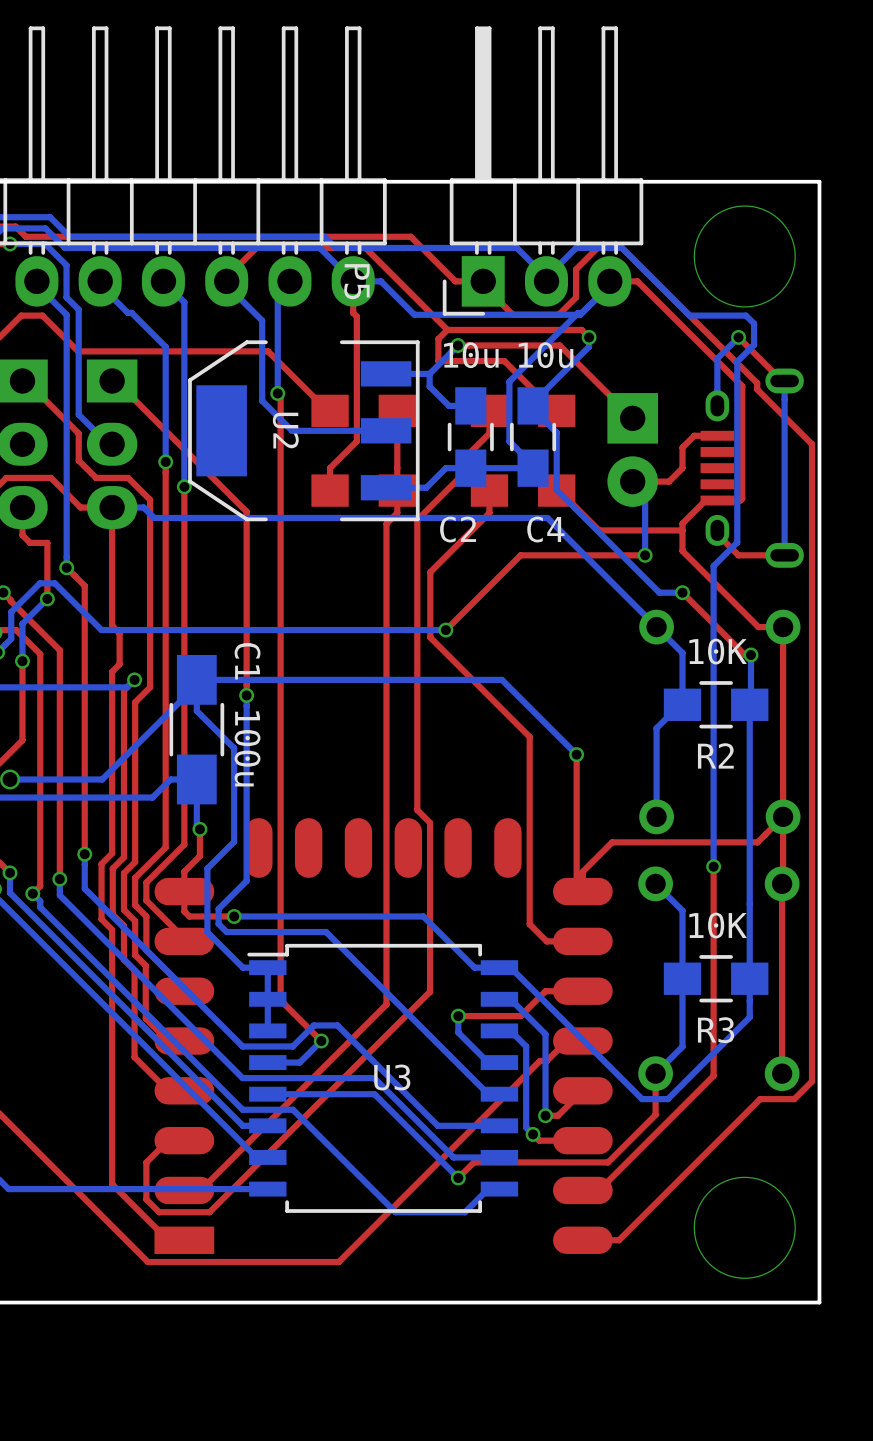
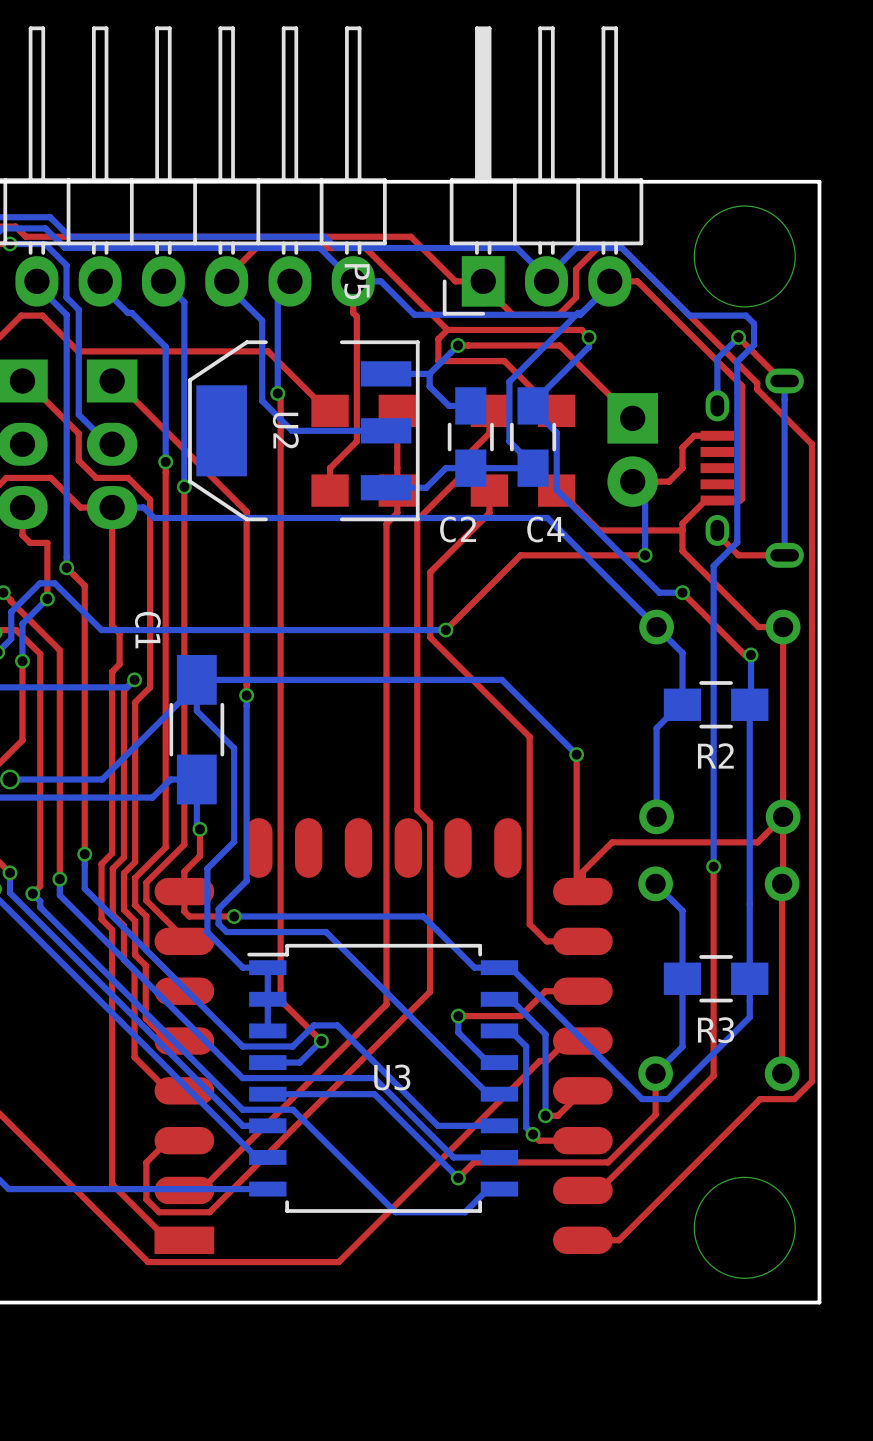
C2 value: 10u (471, 355) -> none
C4 value: 10u (546, 355) -> none
R2 value: 10K (718, 651) -> none
C1 name position: C1 (247, 661) -> C1 (147, 630)
C1 value: 100u (247, 748) -> none
R3 value: 10K (718, 925) -> none

